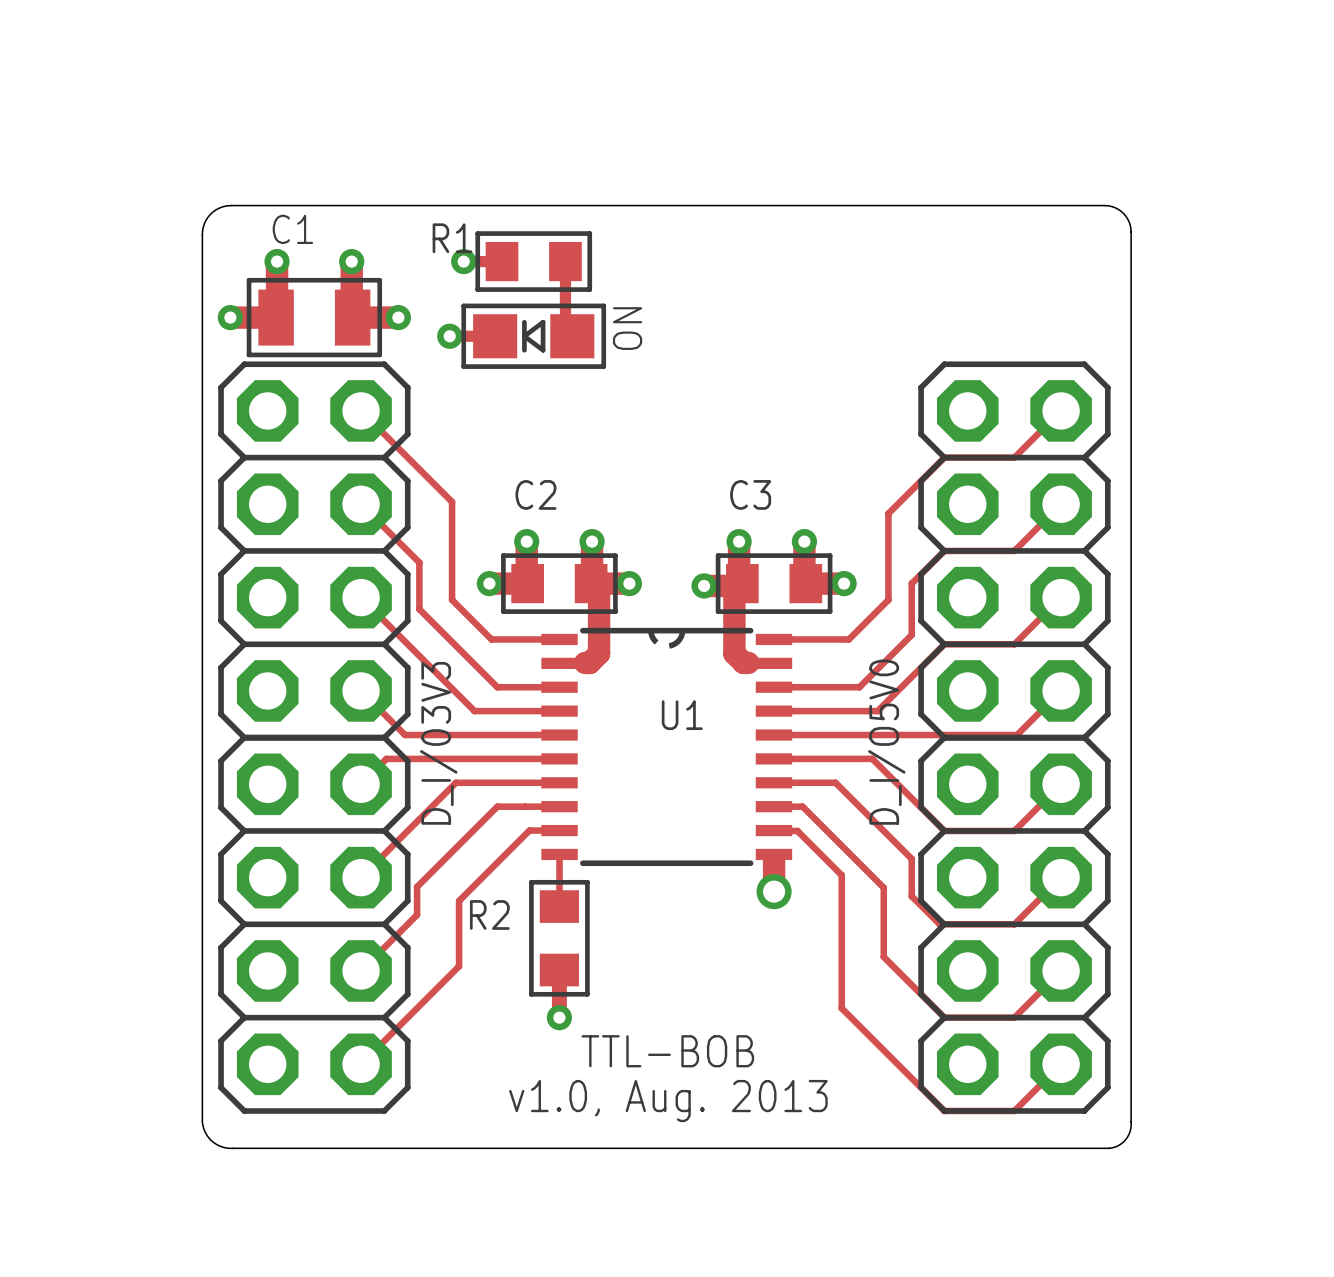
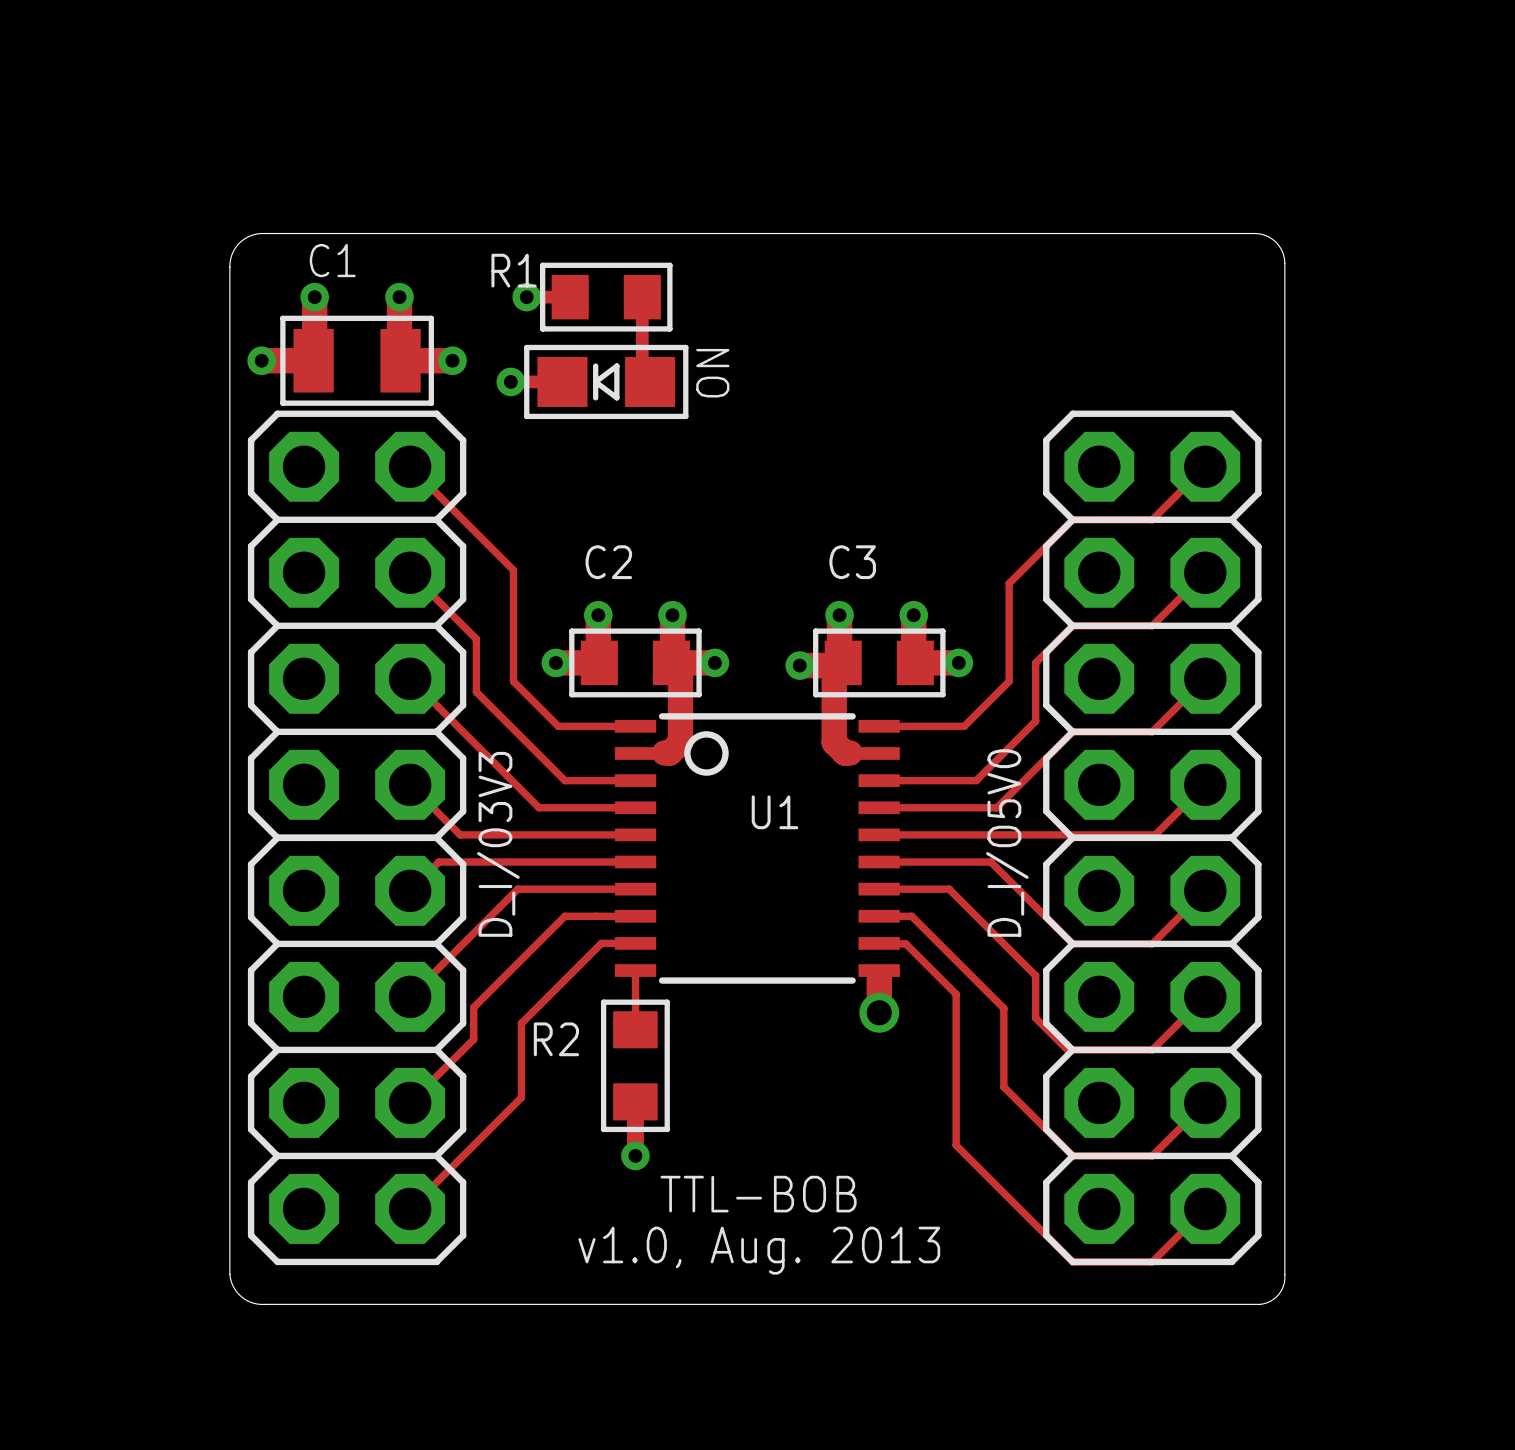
U1 footprint: [541, 627, 793, 867] -> [614, 713, 900, 984]

